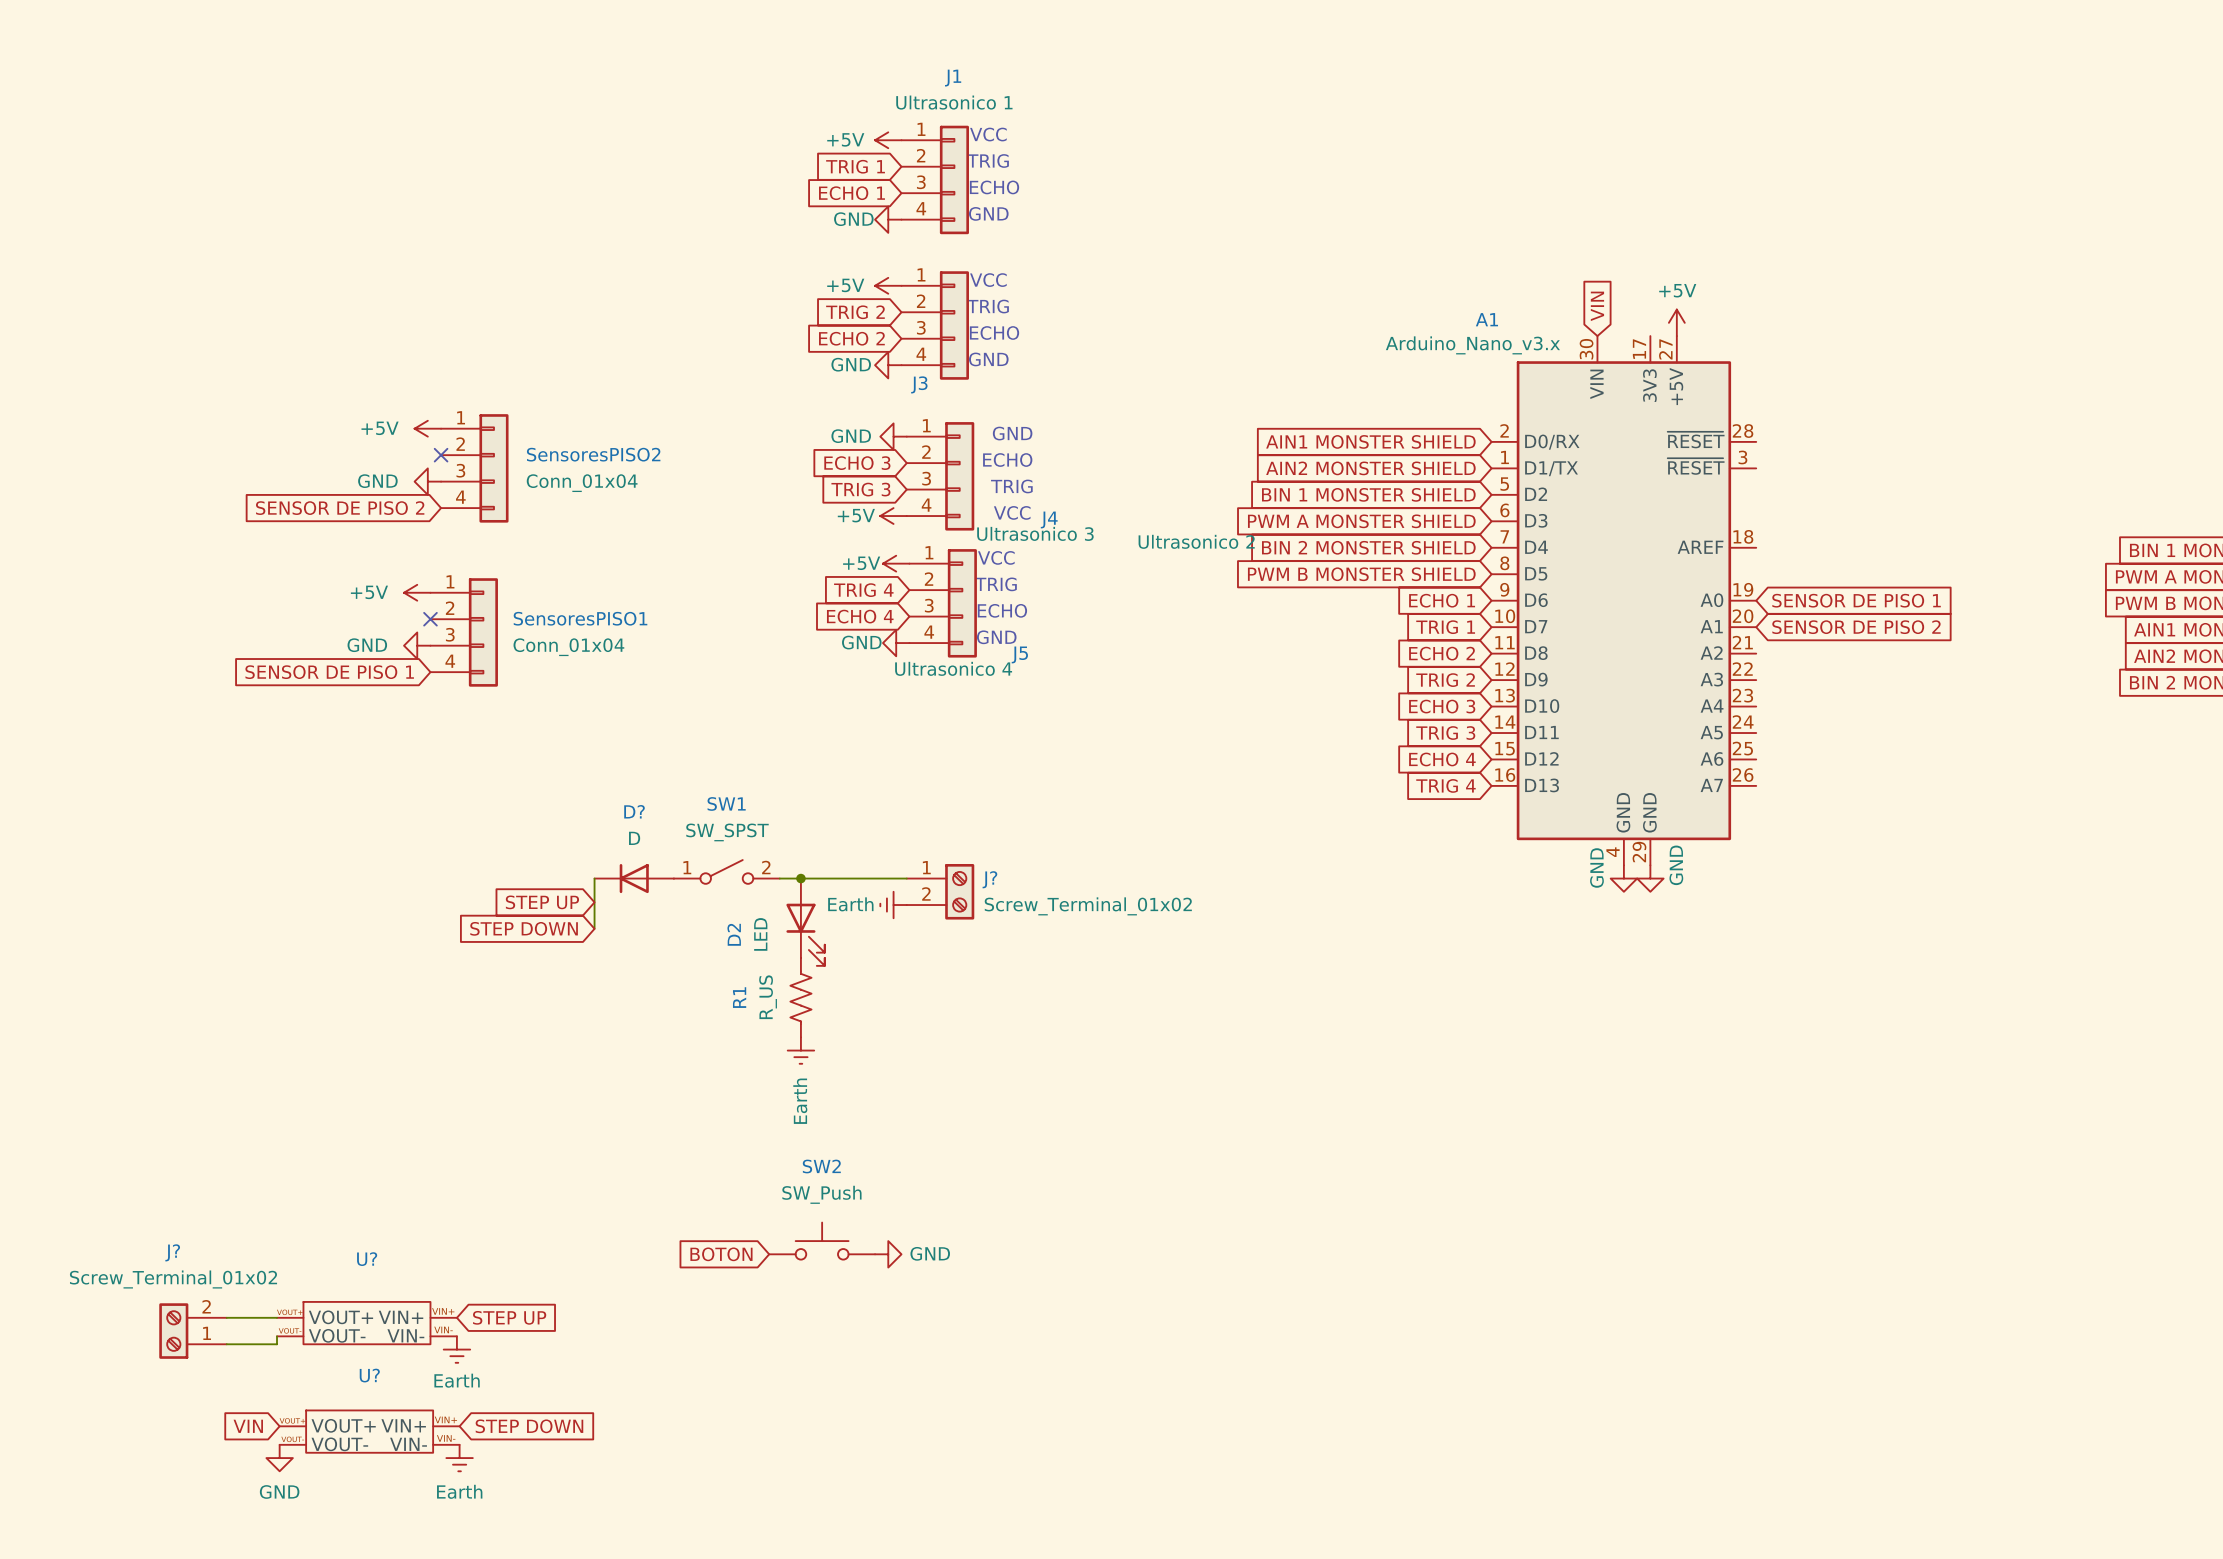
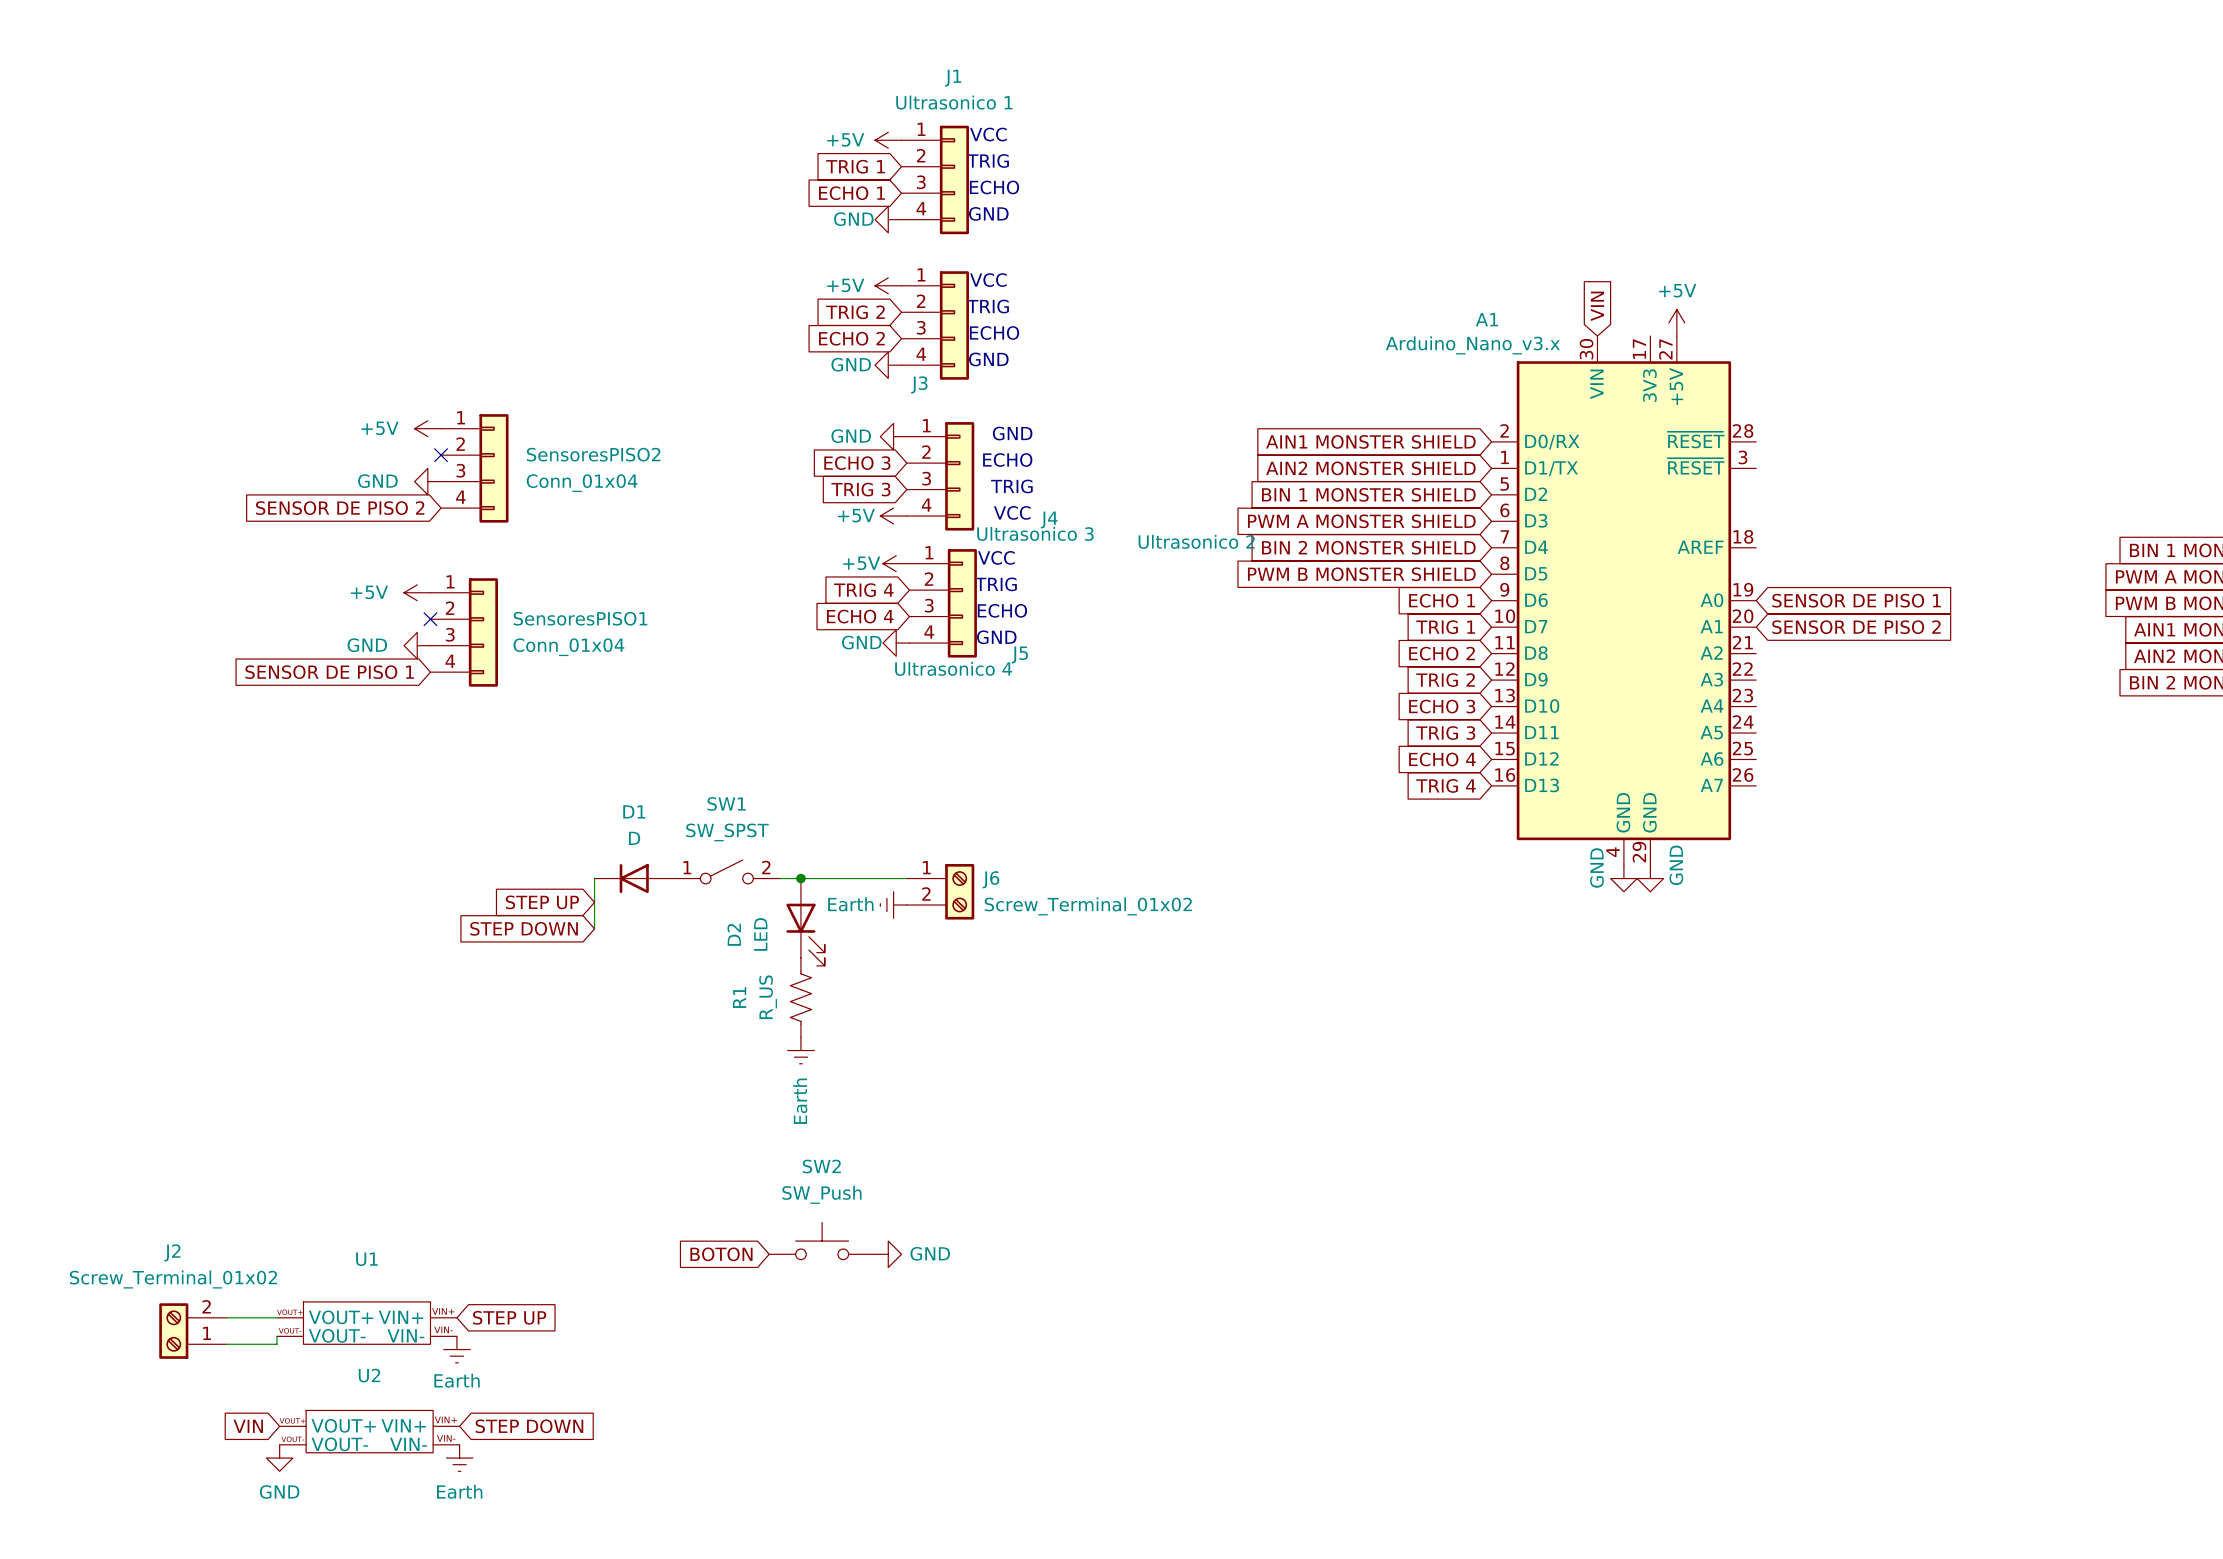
D? name: D? (634, 811) -> D1 (634, 811)
J? name: J? (989, 879) -> J6 (990, 879)
J? name: J? (172, 1252) -> J2 (172, 1252)
U? name: U? (367, 1259) -> U1 (366, 1259)
U? name: U? (369, 1375) -> U2 (369, 1375)

